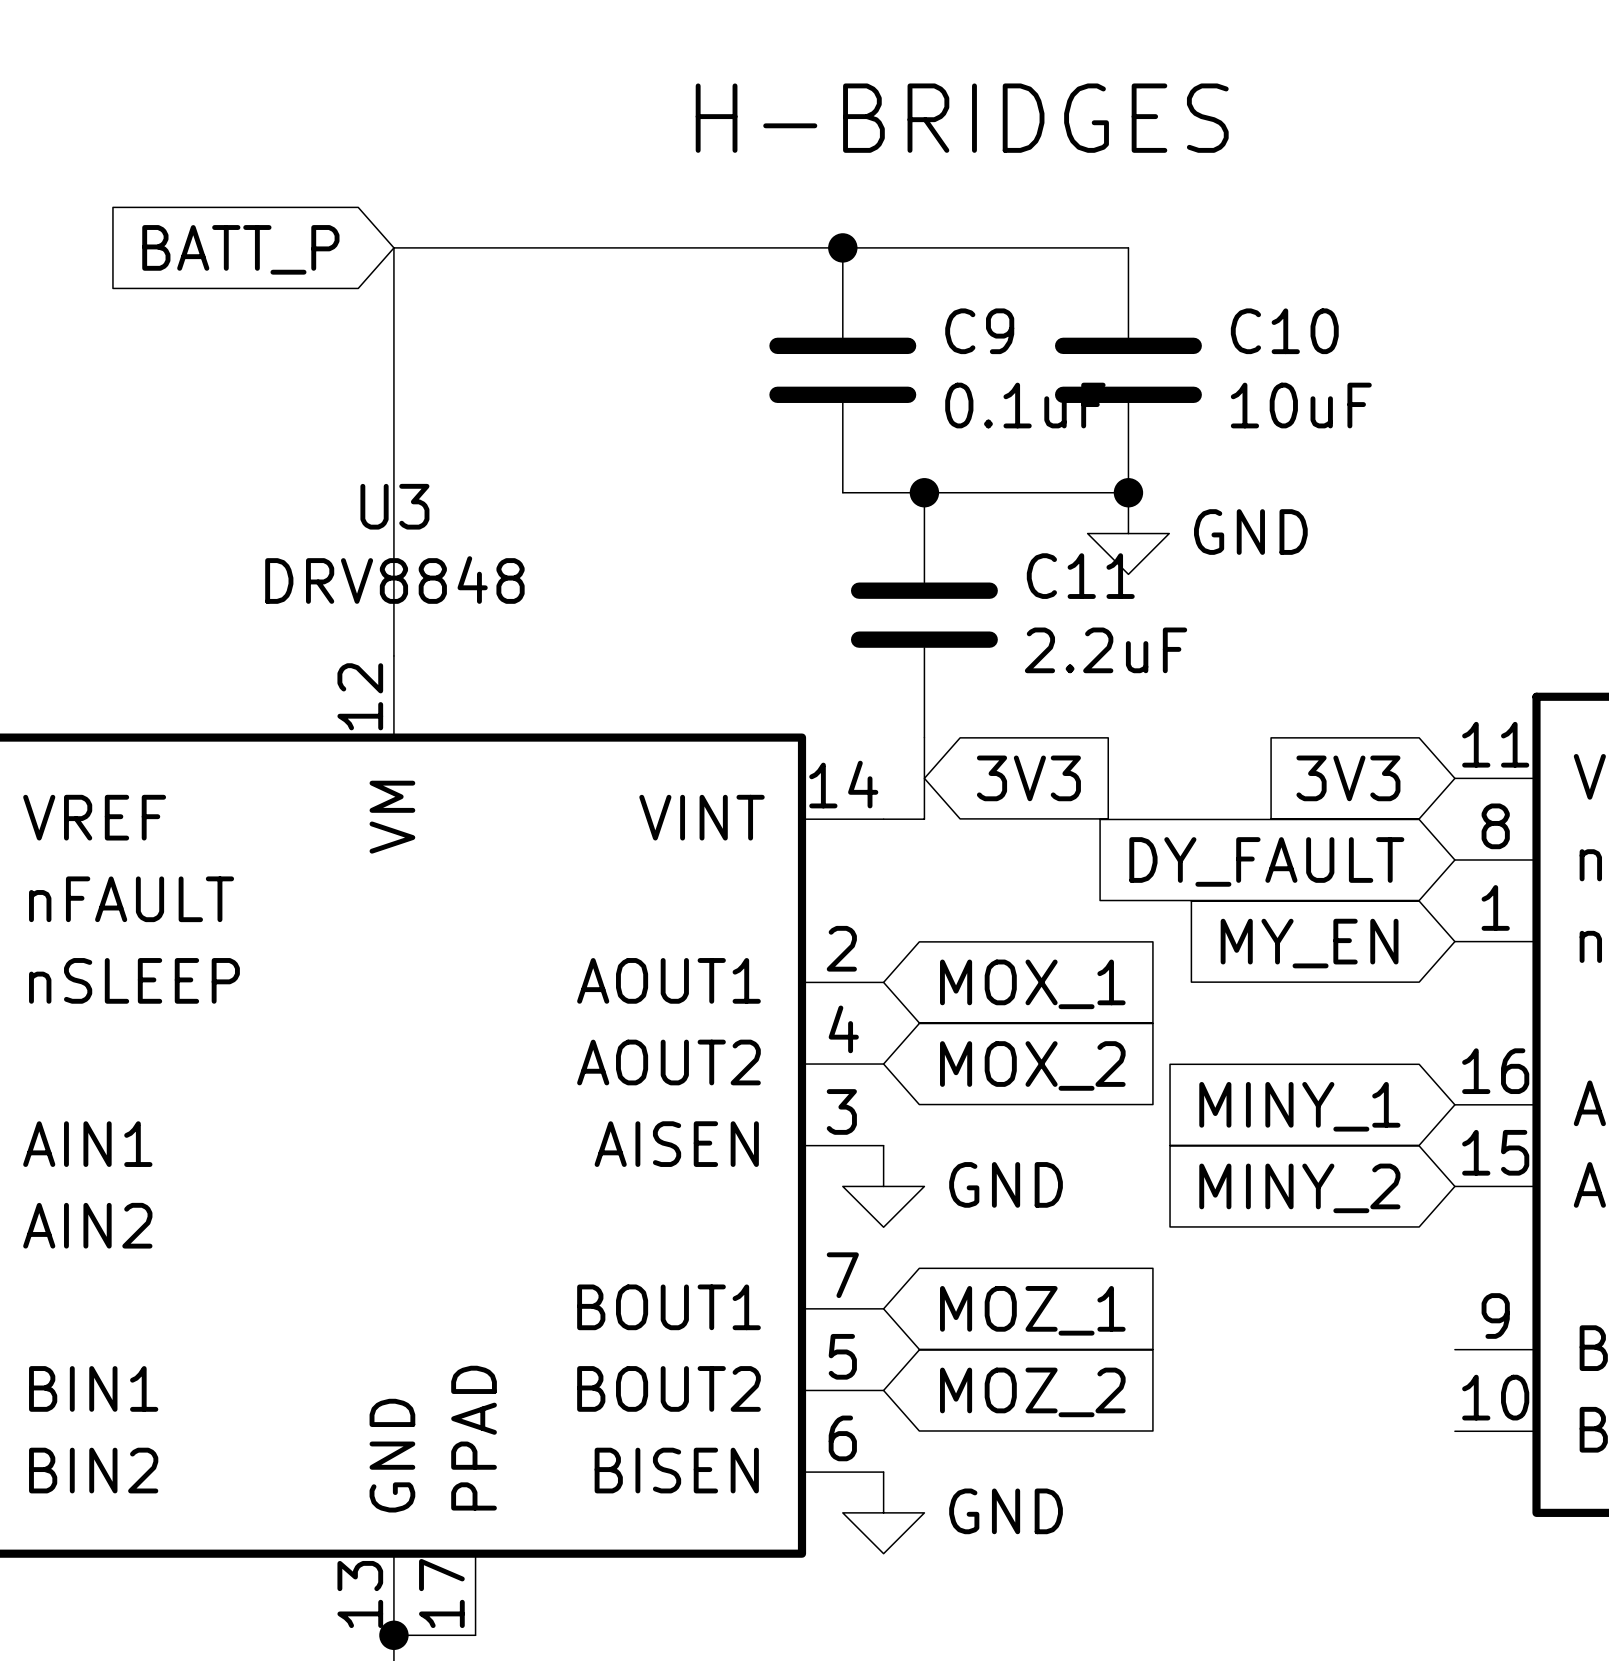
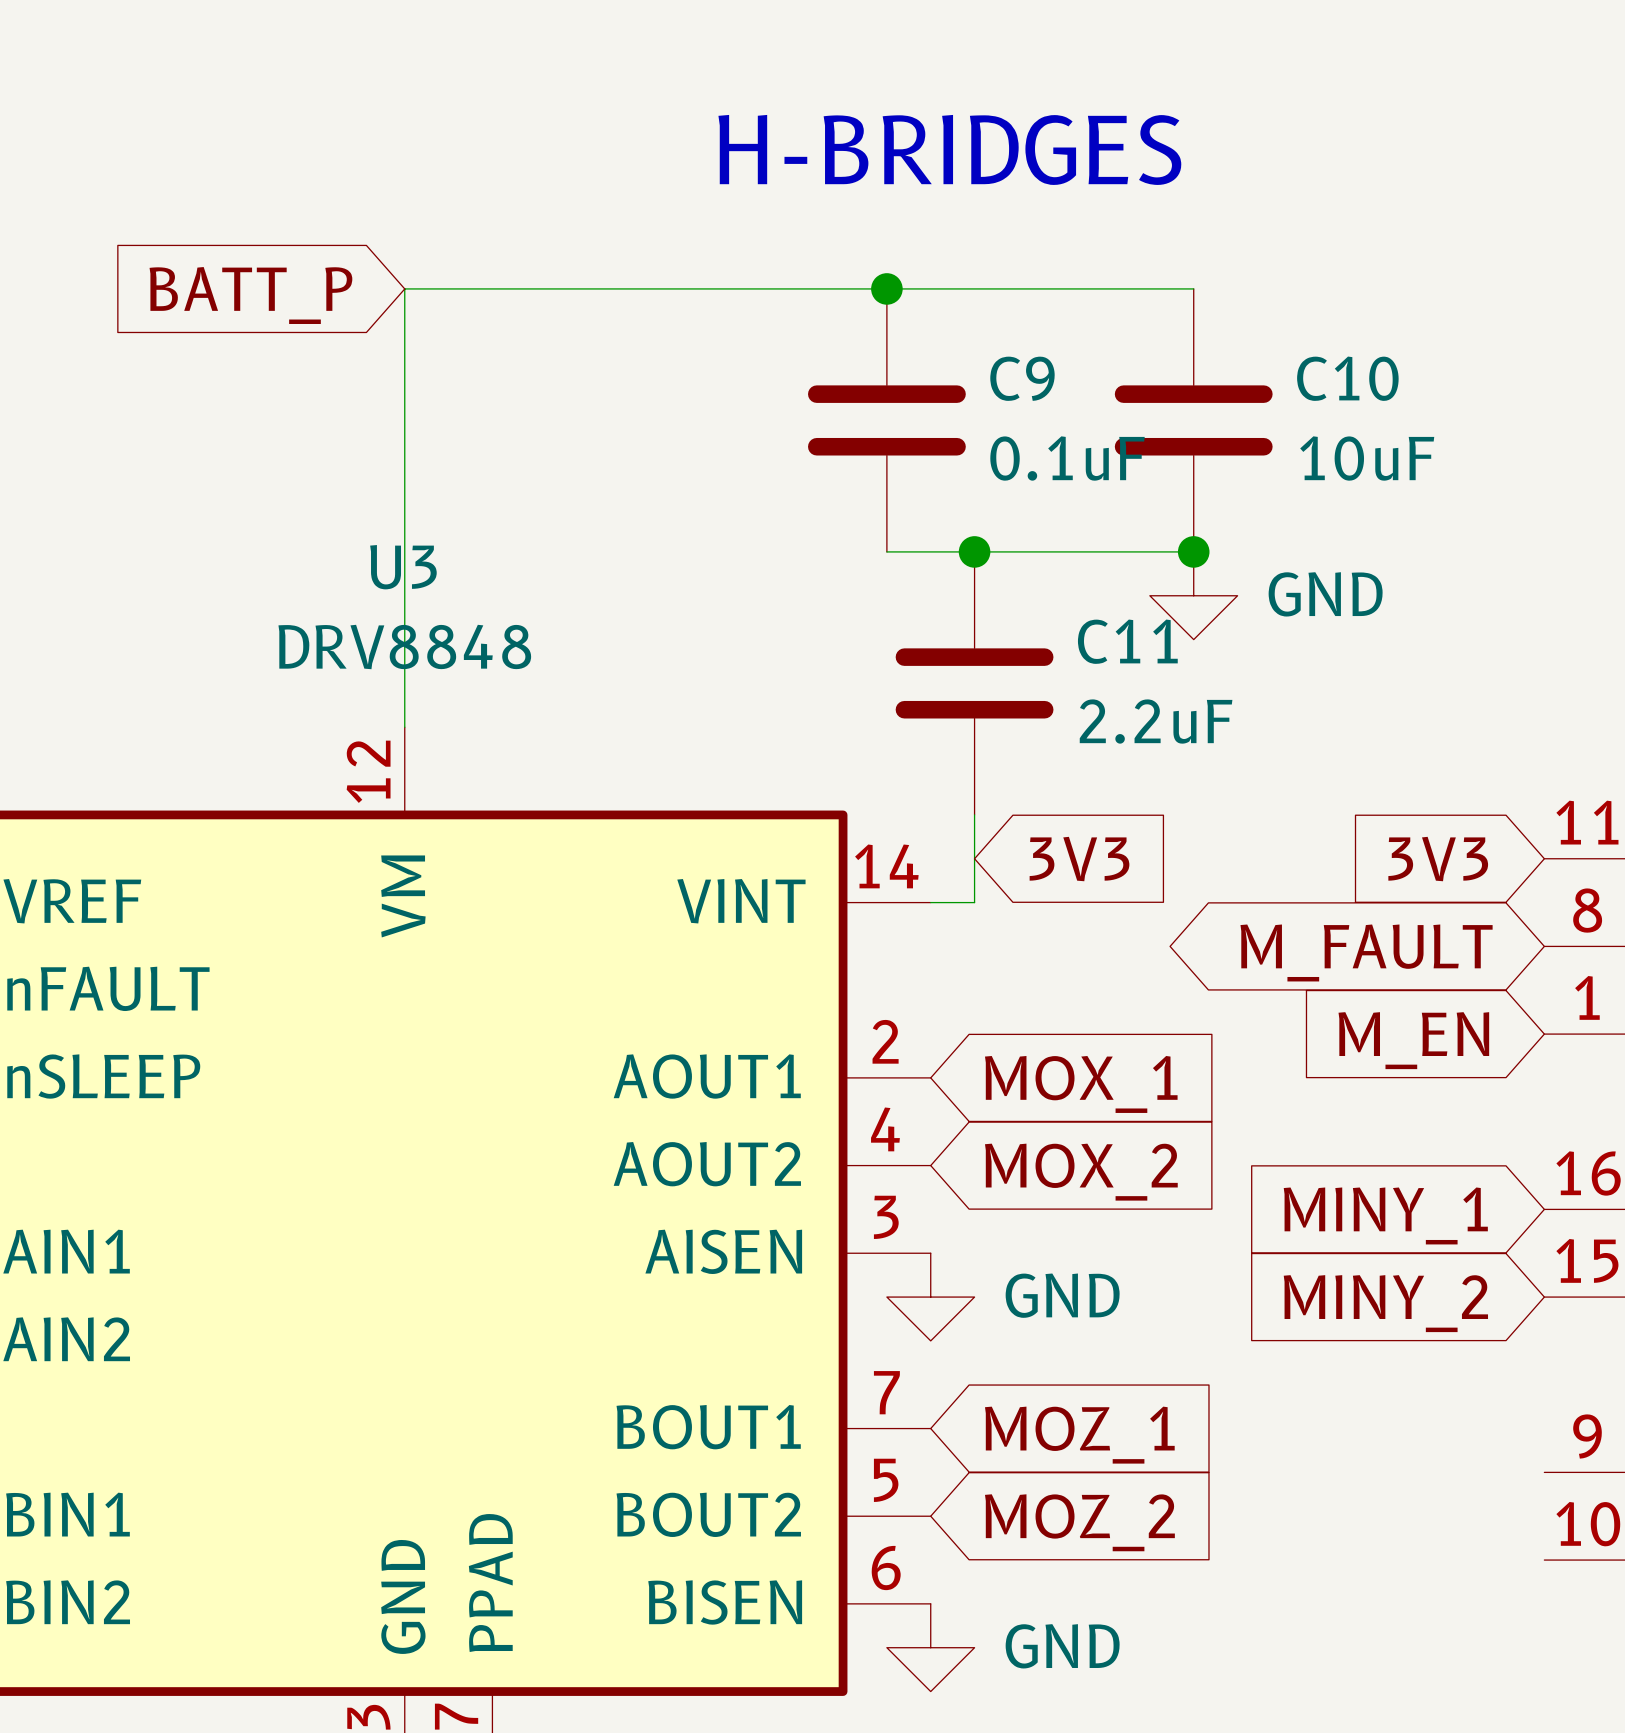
global label shape: input (1266, 861) -> bidirectional (1366, 952)
global label: DY_FAULT (1266, 861) -> M_FAULT (1366, 952)
global label: MY_EN (1309, 943) -> M_EN (1413, 1040)

